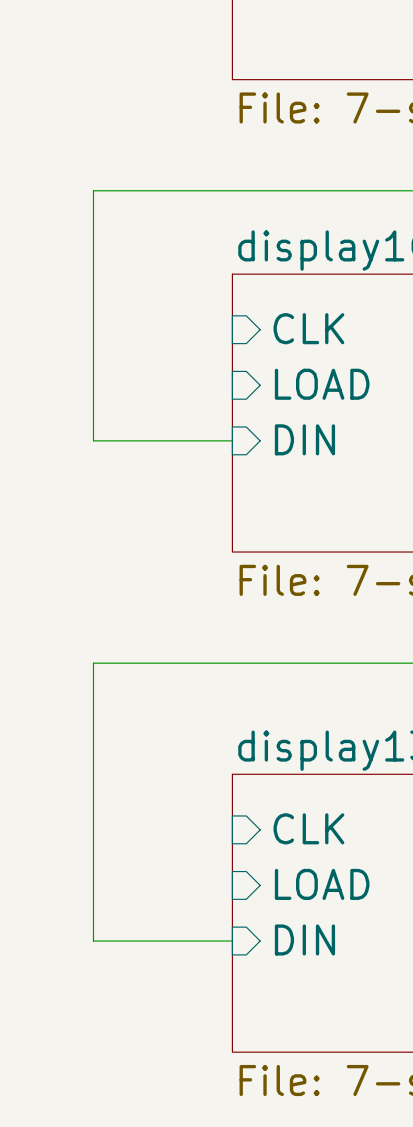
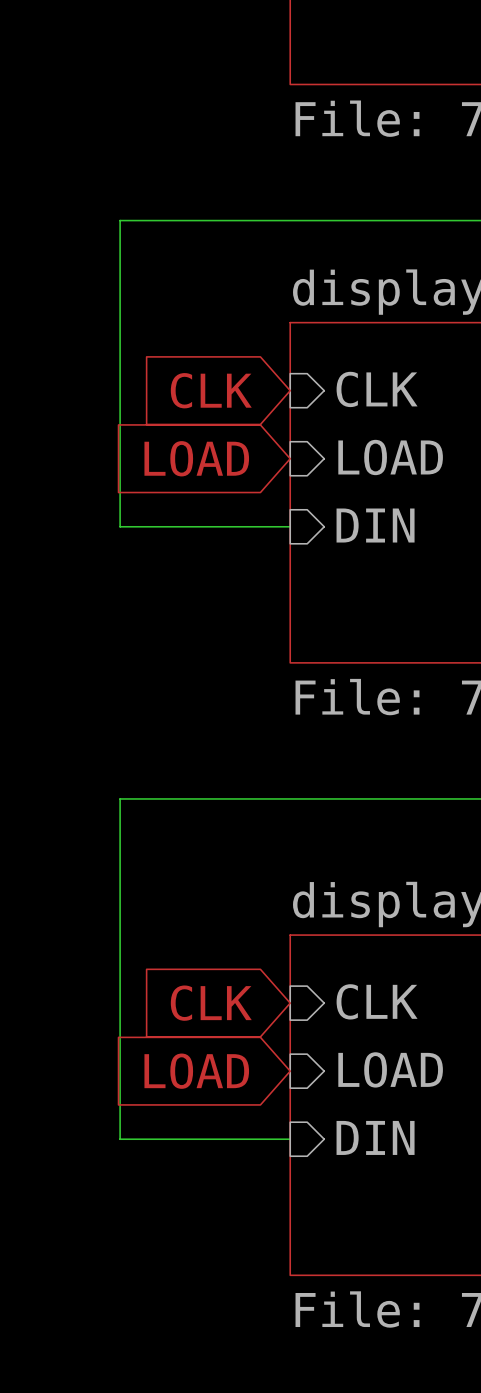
global label: none -> CLK (211, 390)
global label: none -> LOAD (196, 458)
global label: none -> CLK (211, 1003)
global label: none -> LOAD (196, 1071)

